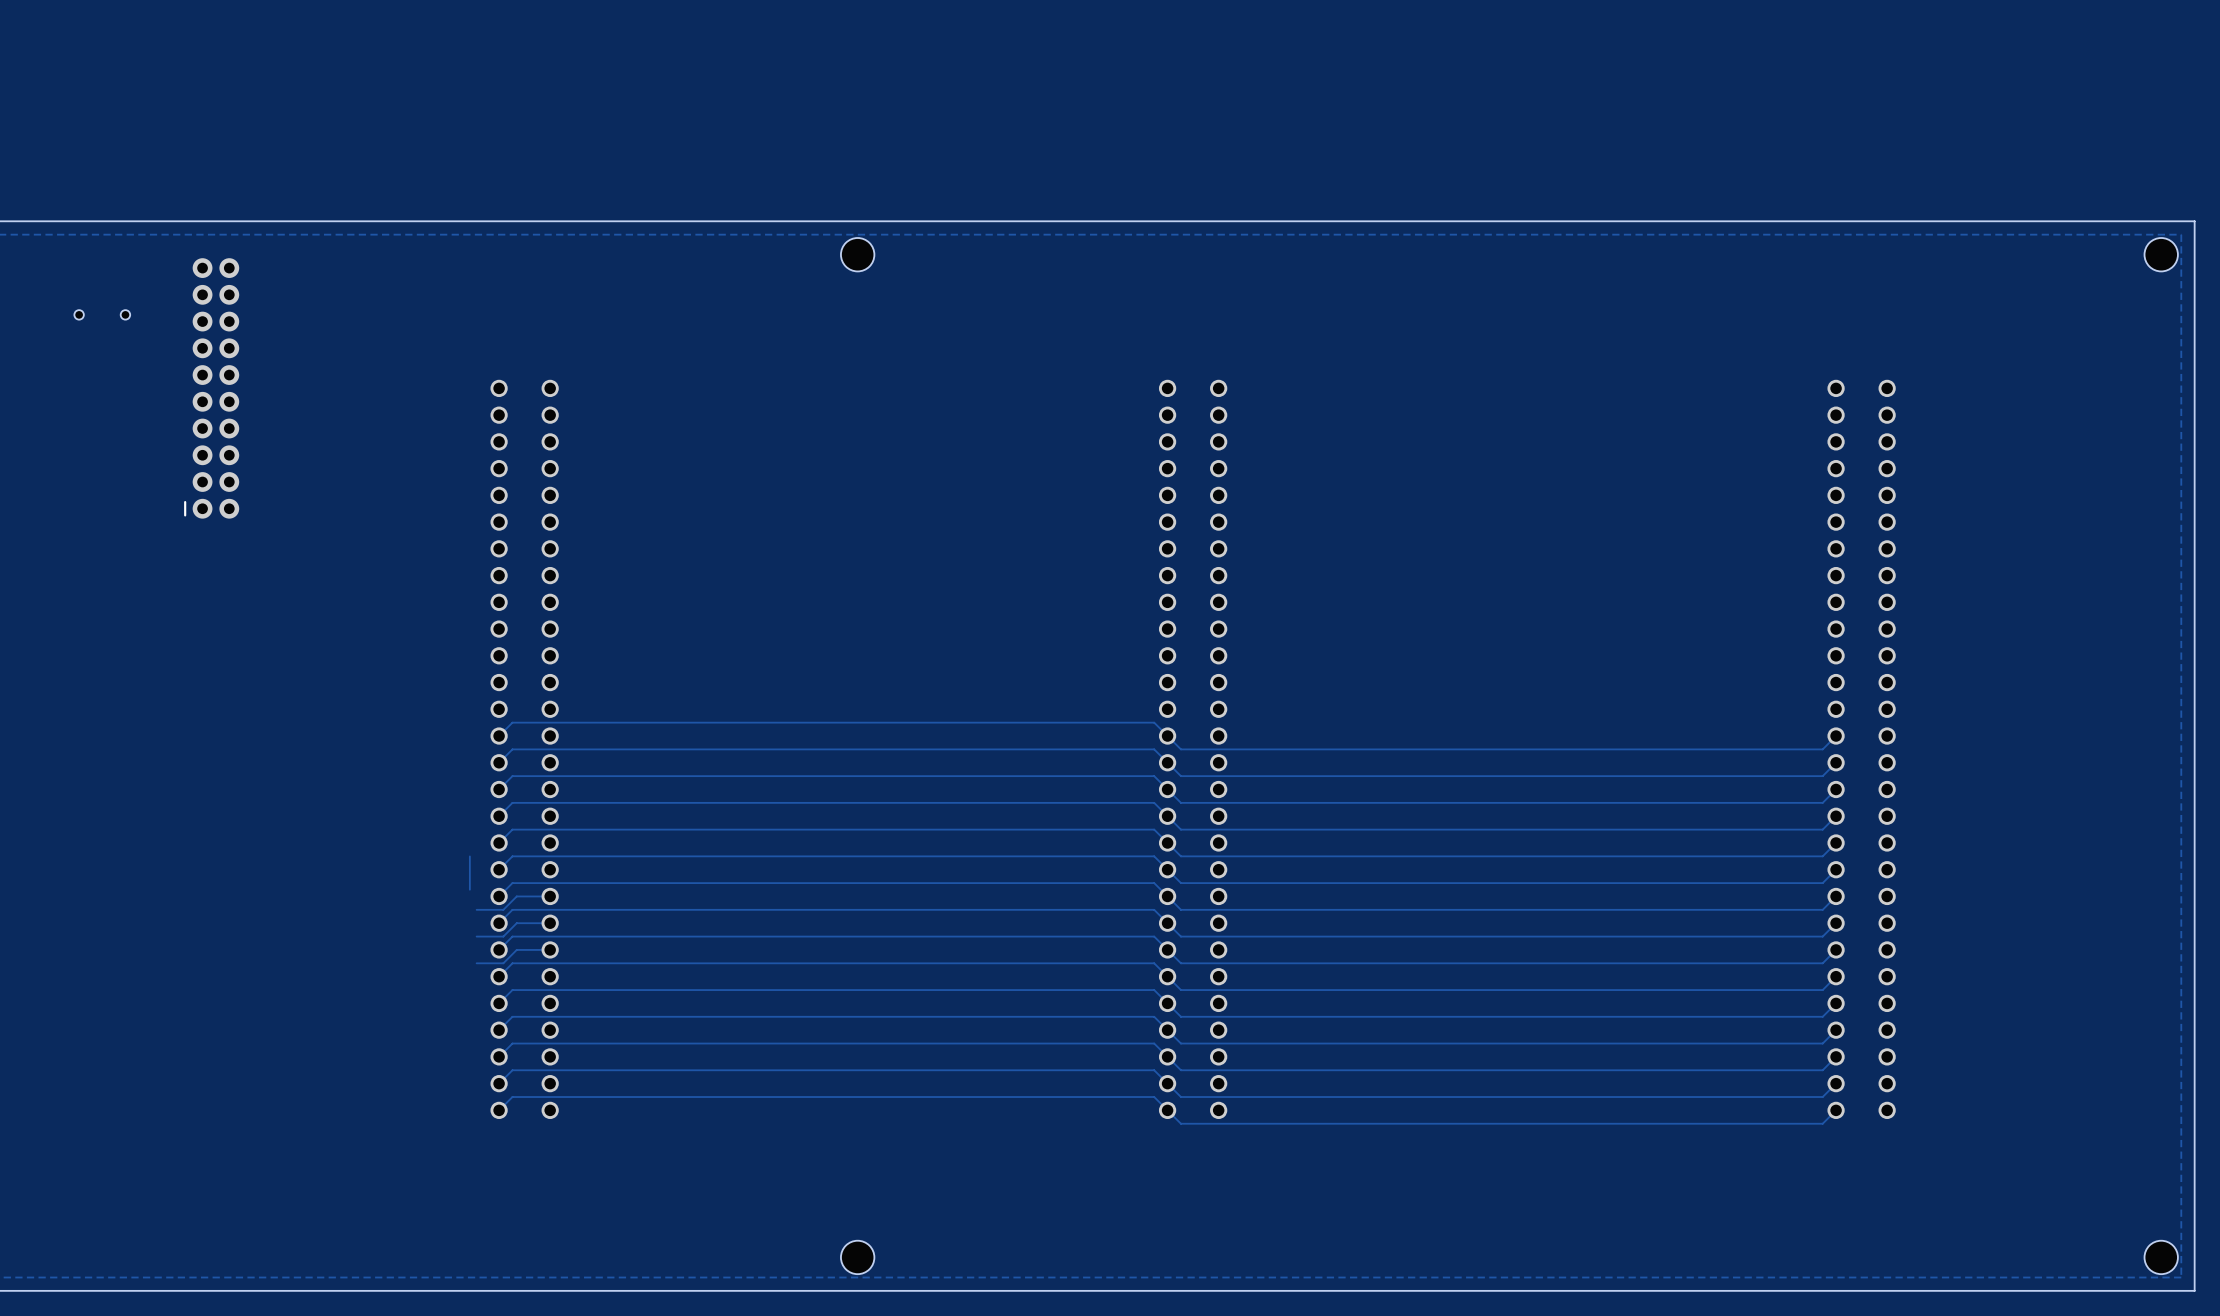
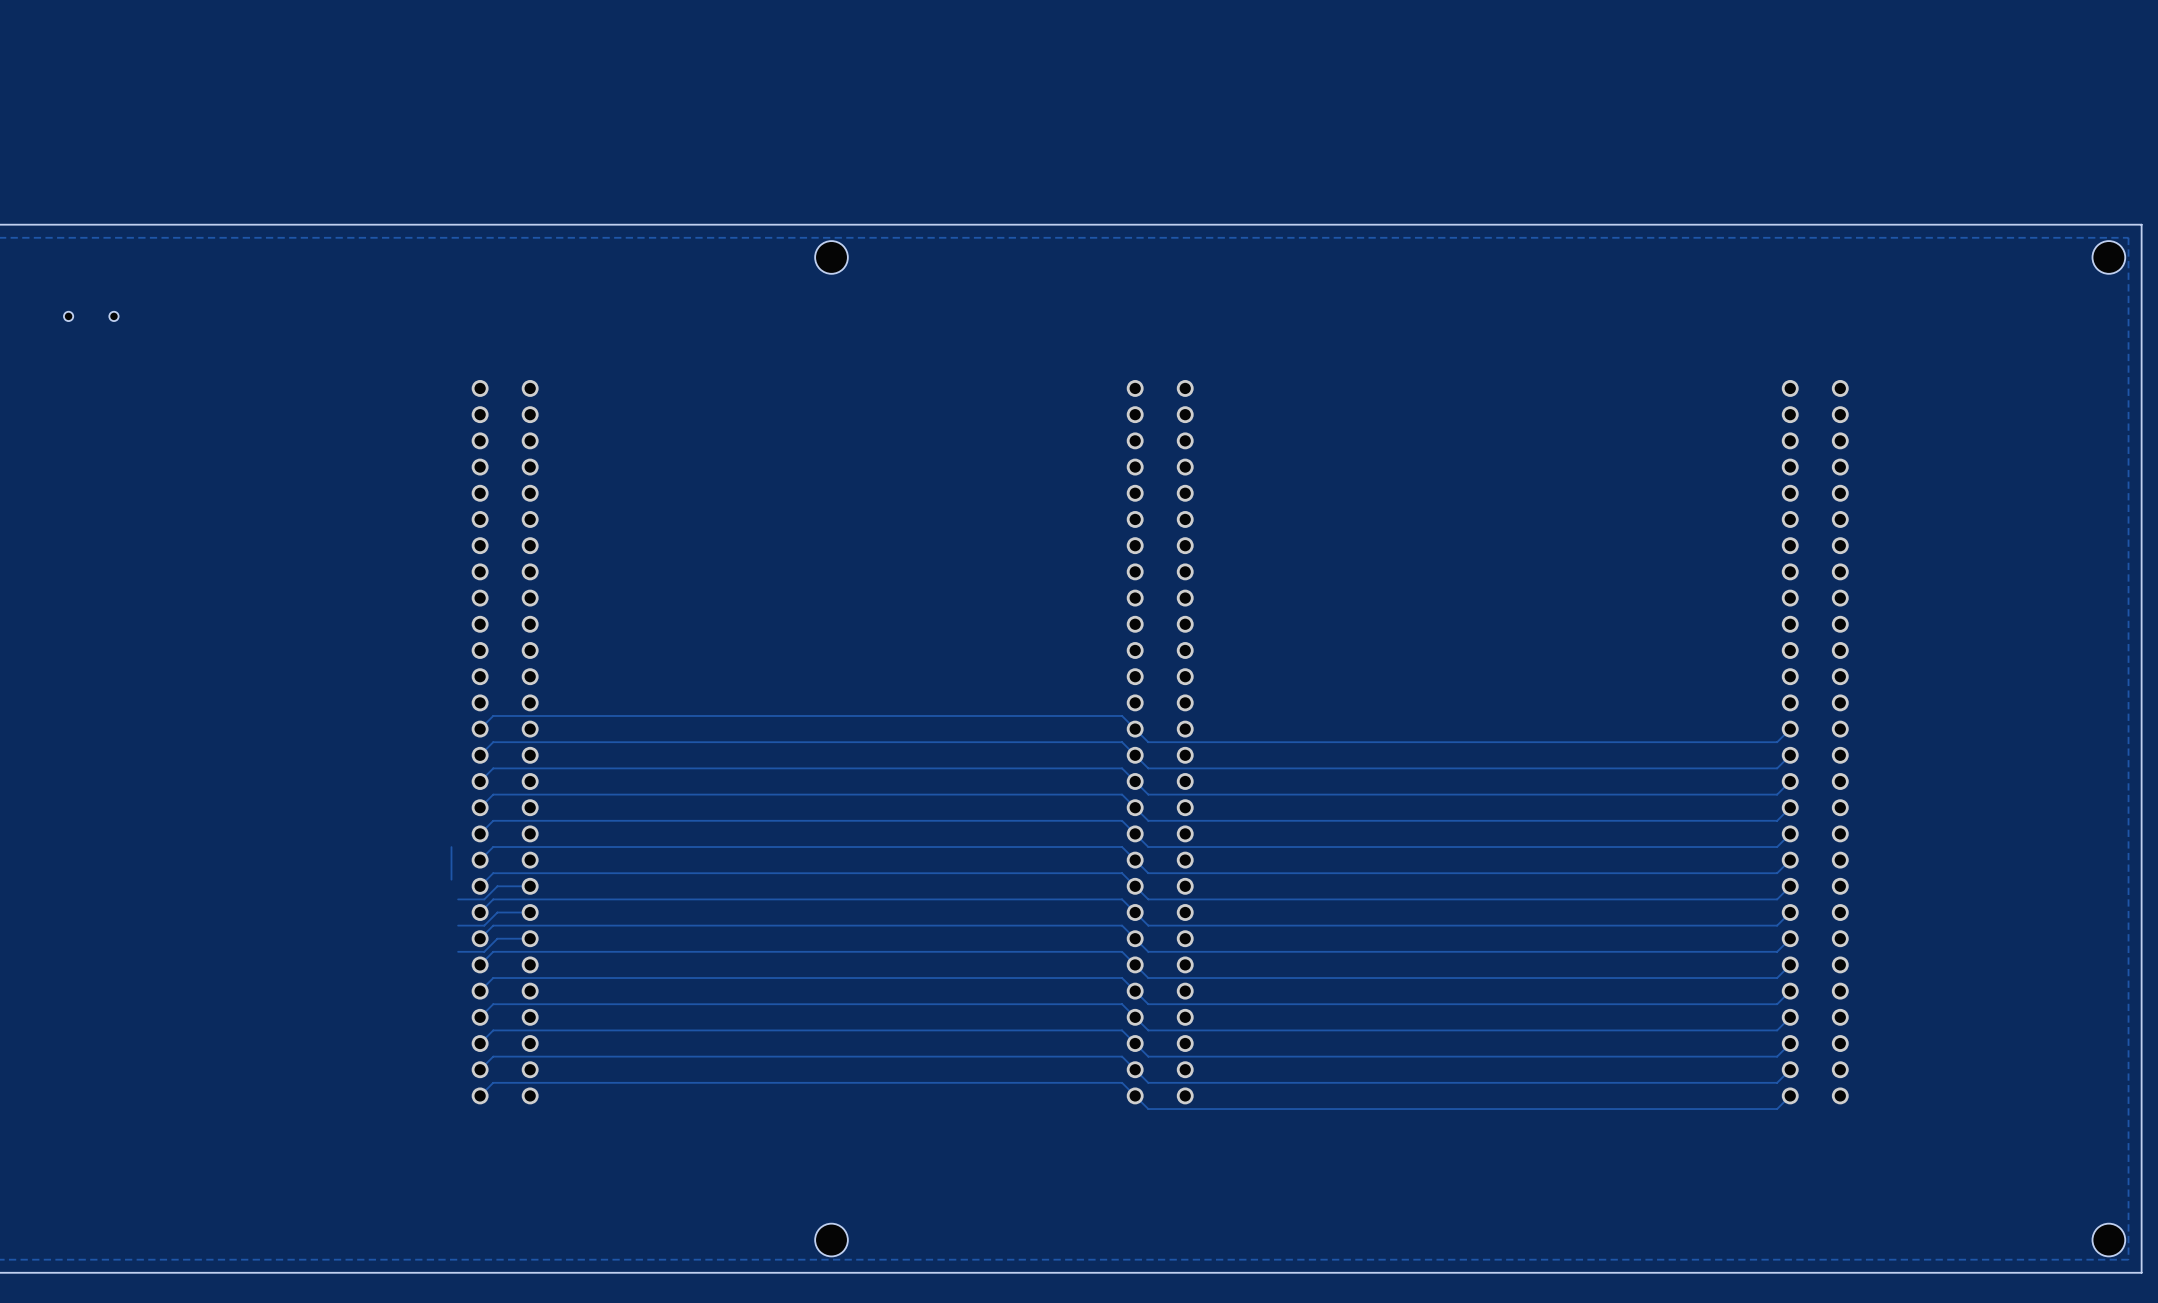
part: (211, 388) -> none

